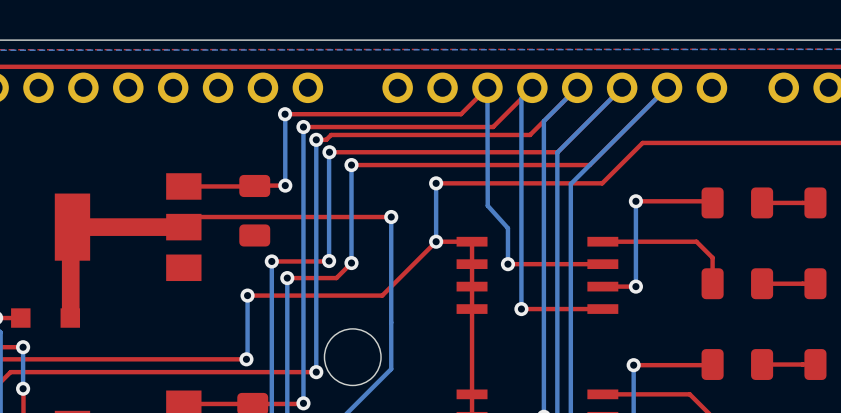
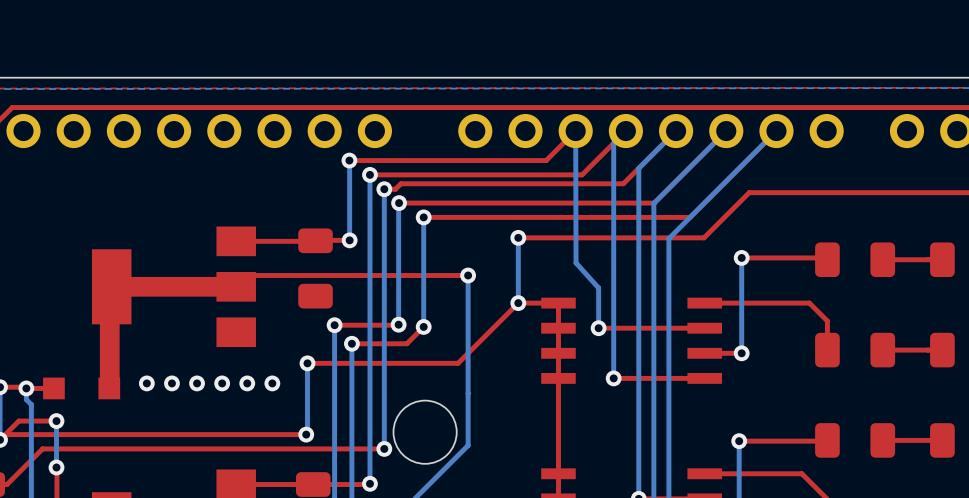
via: none -> (146, 383)
via: none -> (171, 383)
via: none -> (197, 383)
via: none -> (222, 383)
via: none -> (247, 383)
via: none -> (272, 383)

